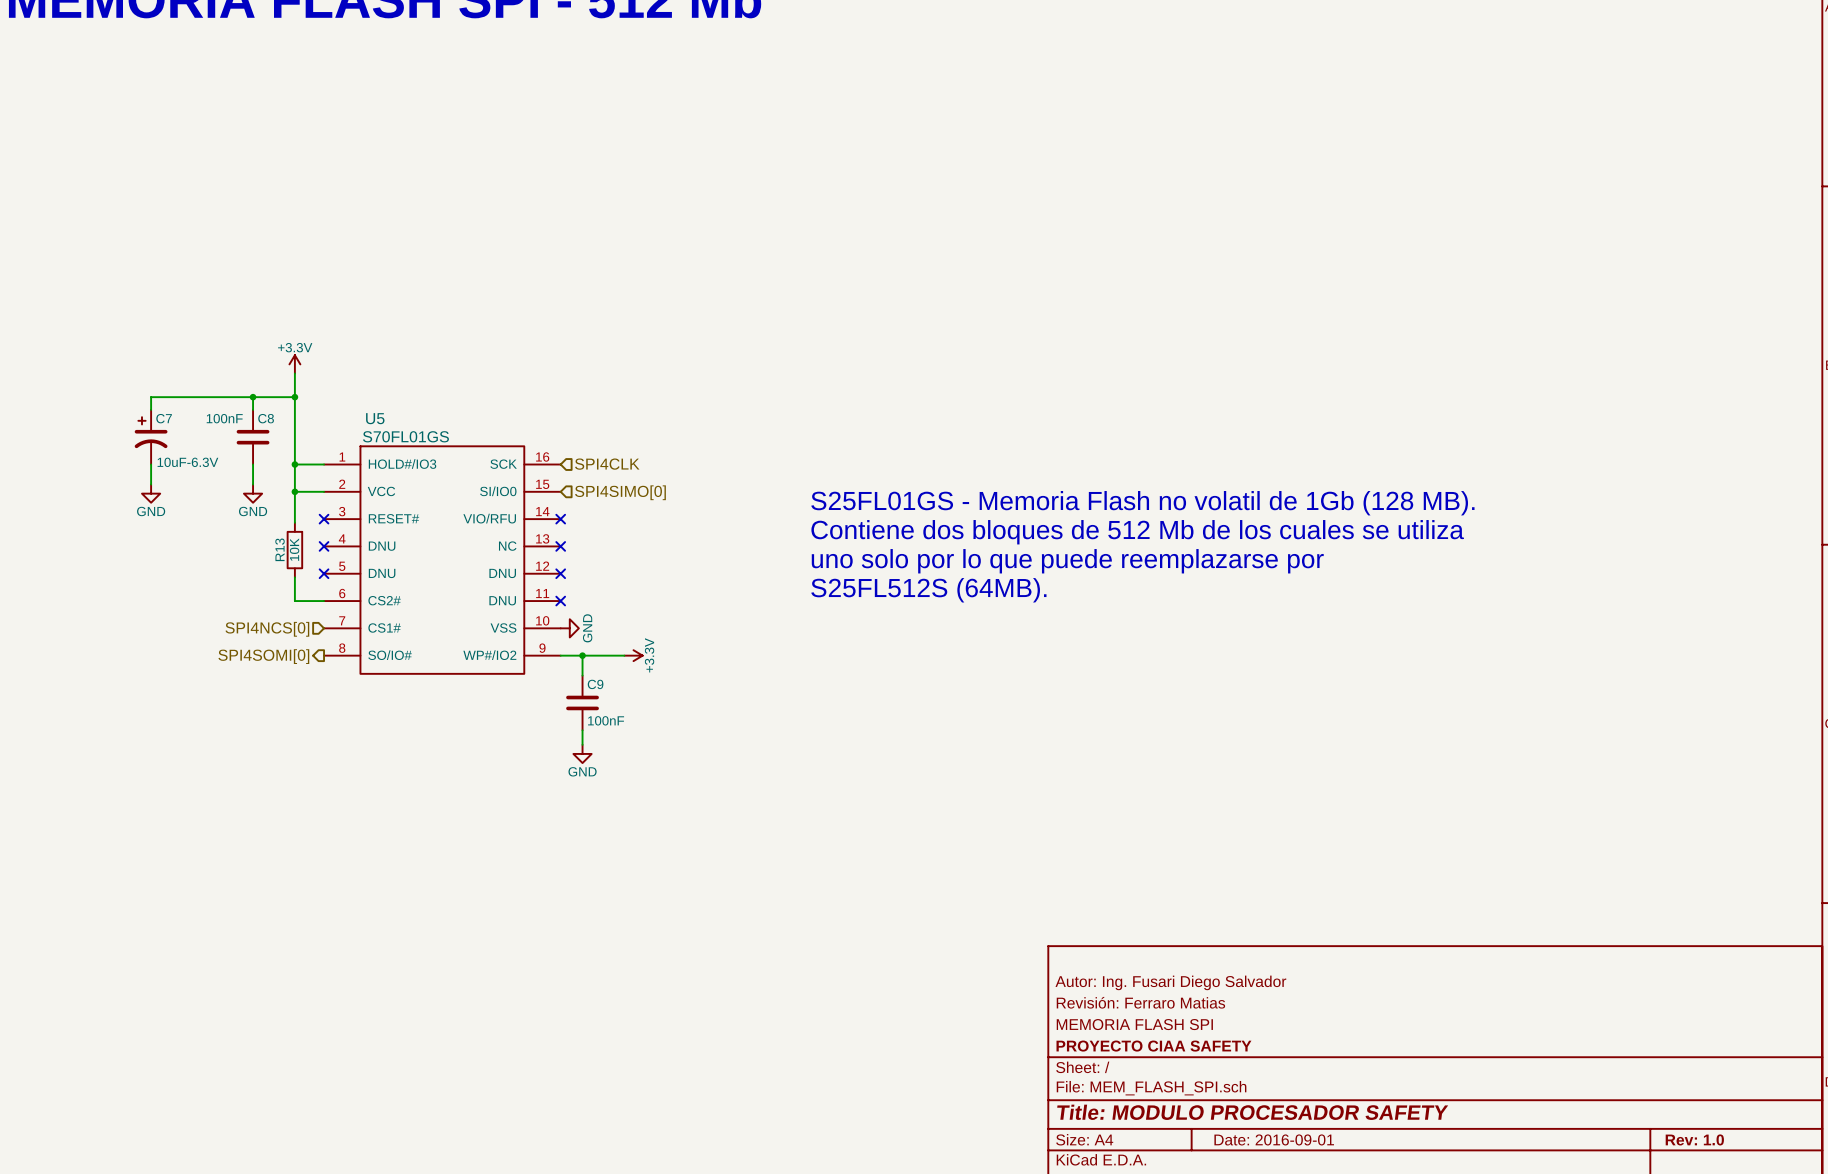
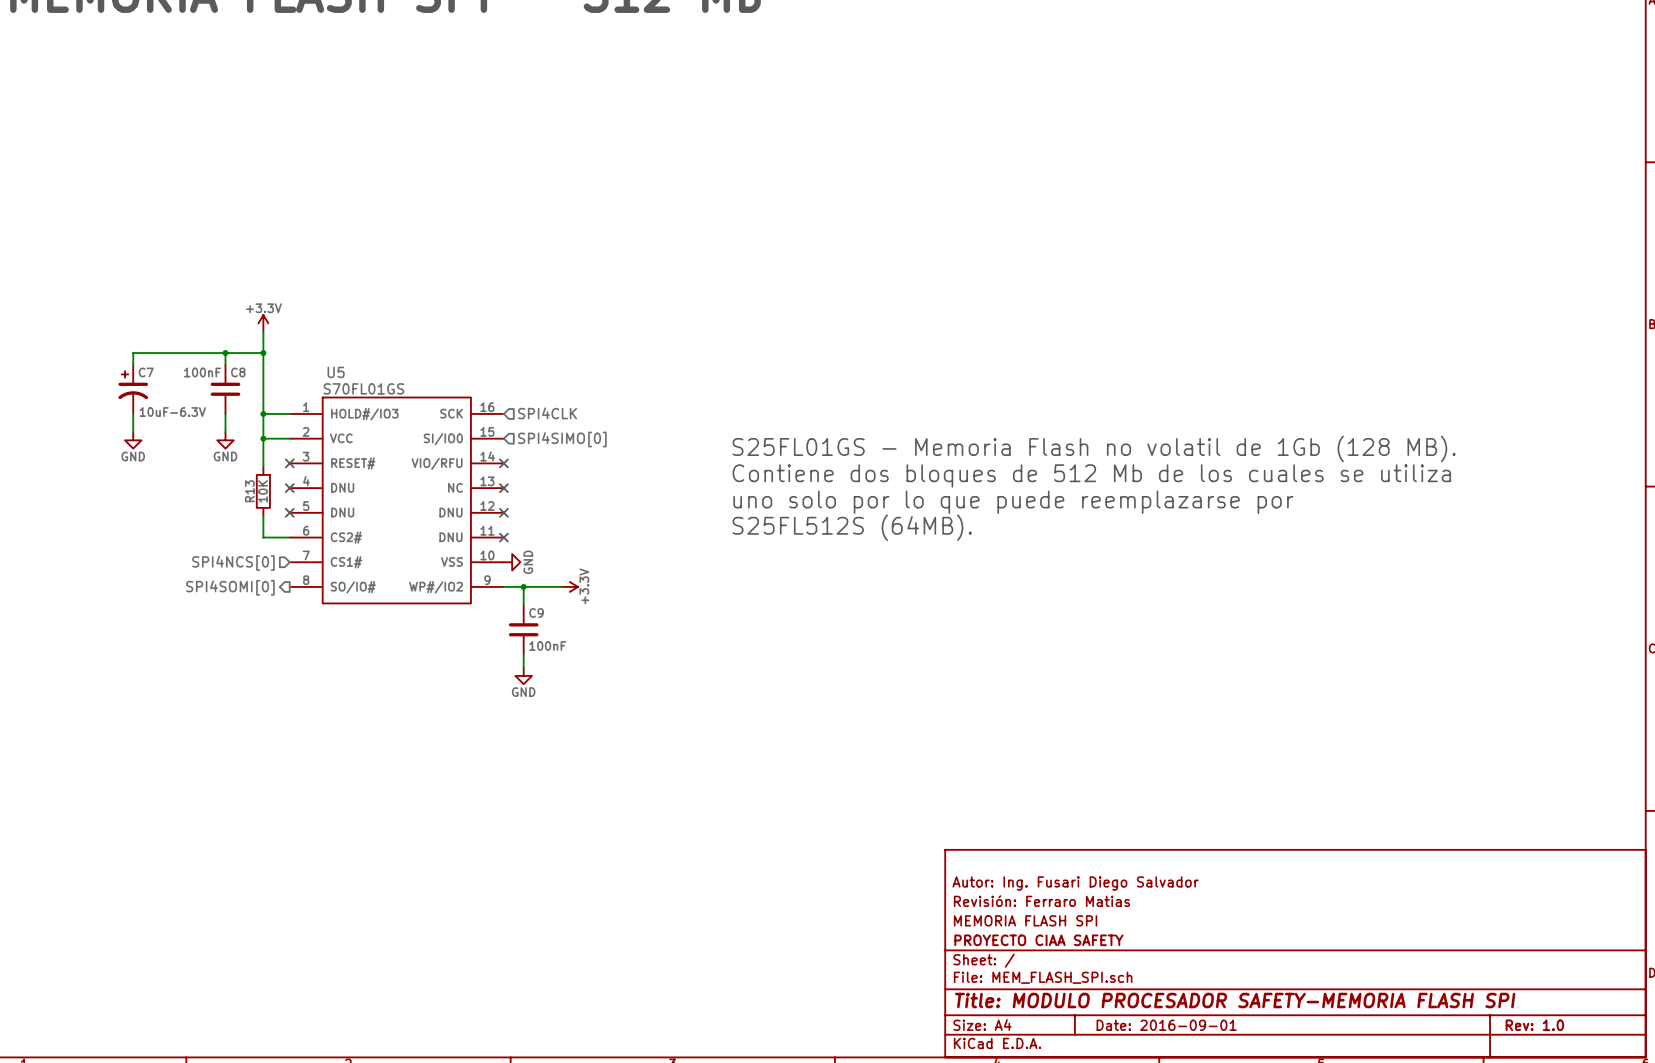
title block: Title: MODULO PROCESADOR SAFETY (1252, 1112) -> Title: MODULO PROCESADOR SAFETY-MEMORIA FLASH SPI (1235, 1000)

